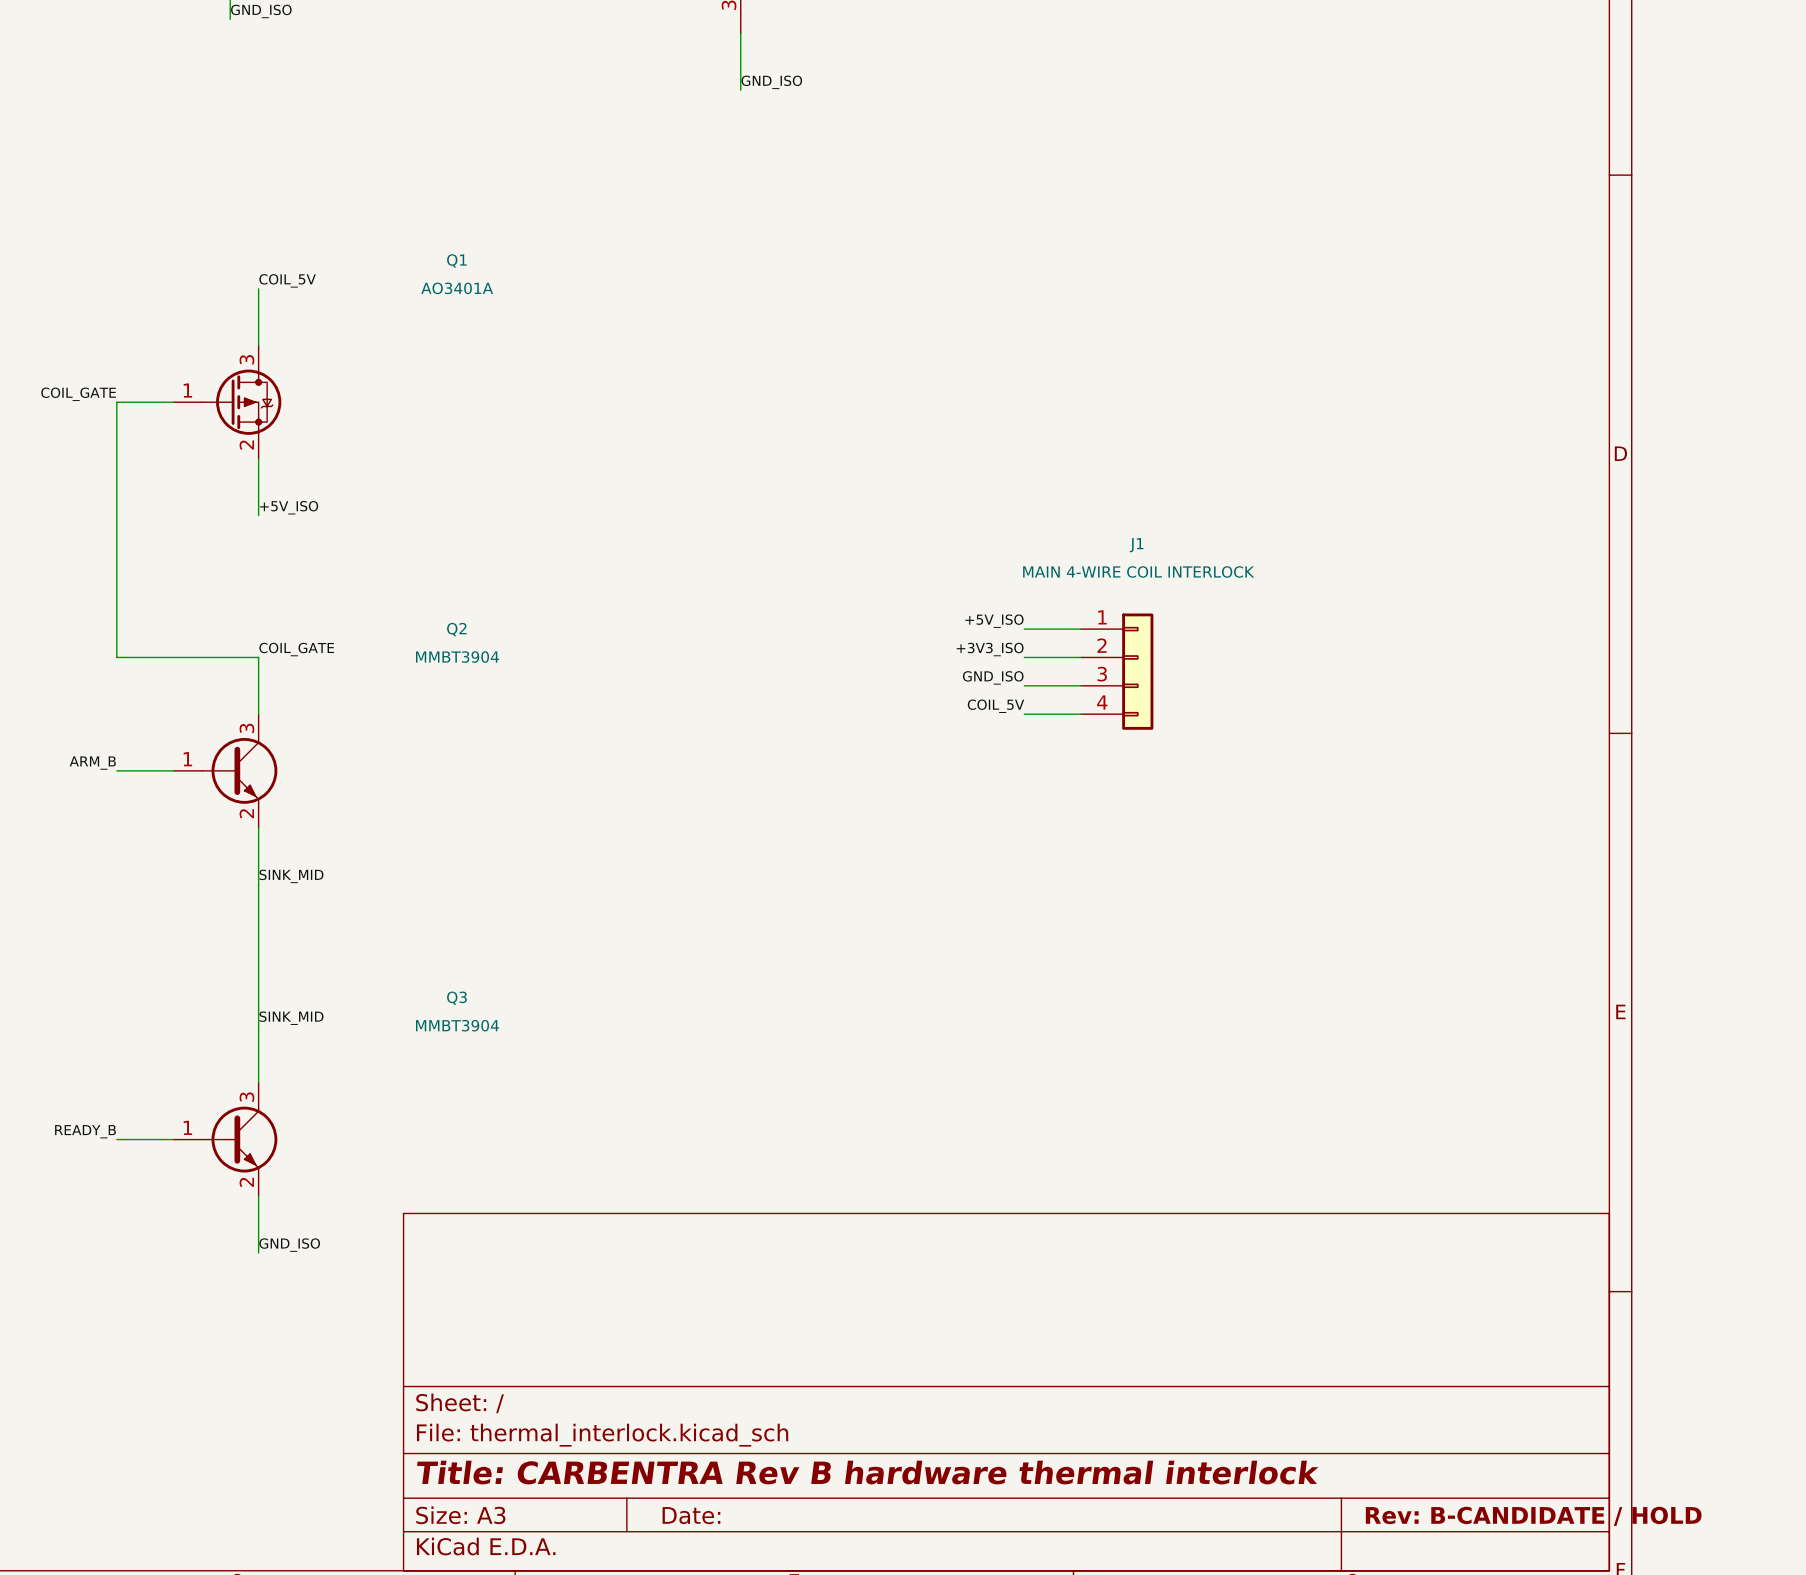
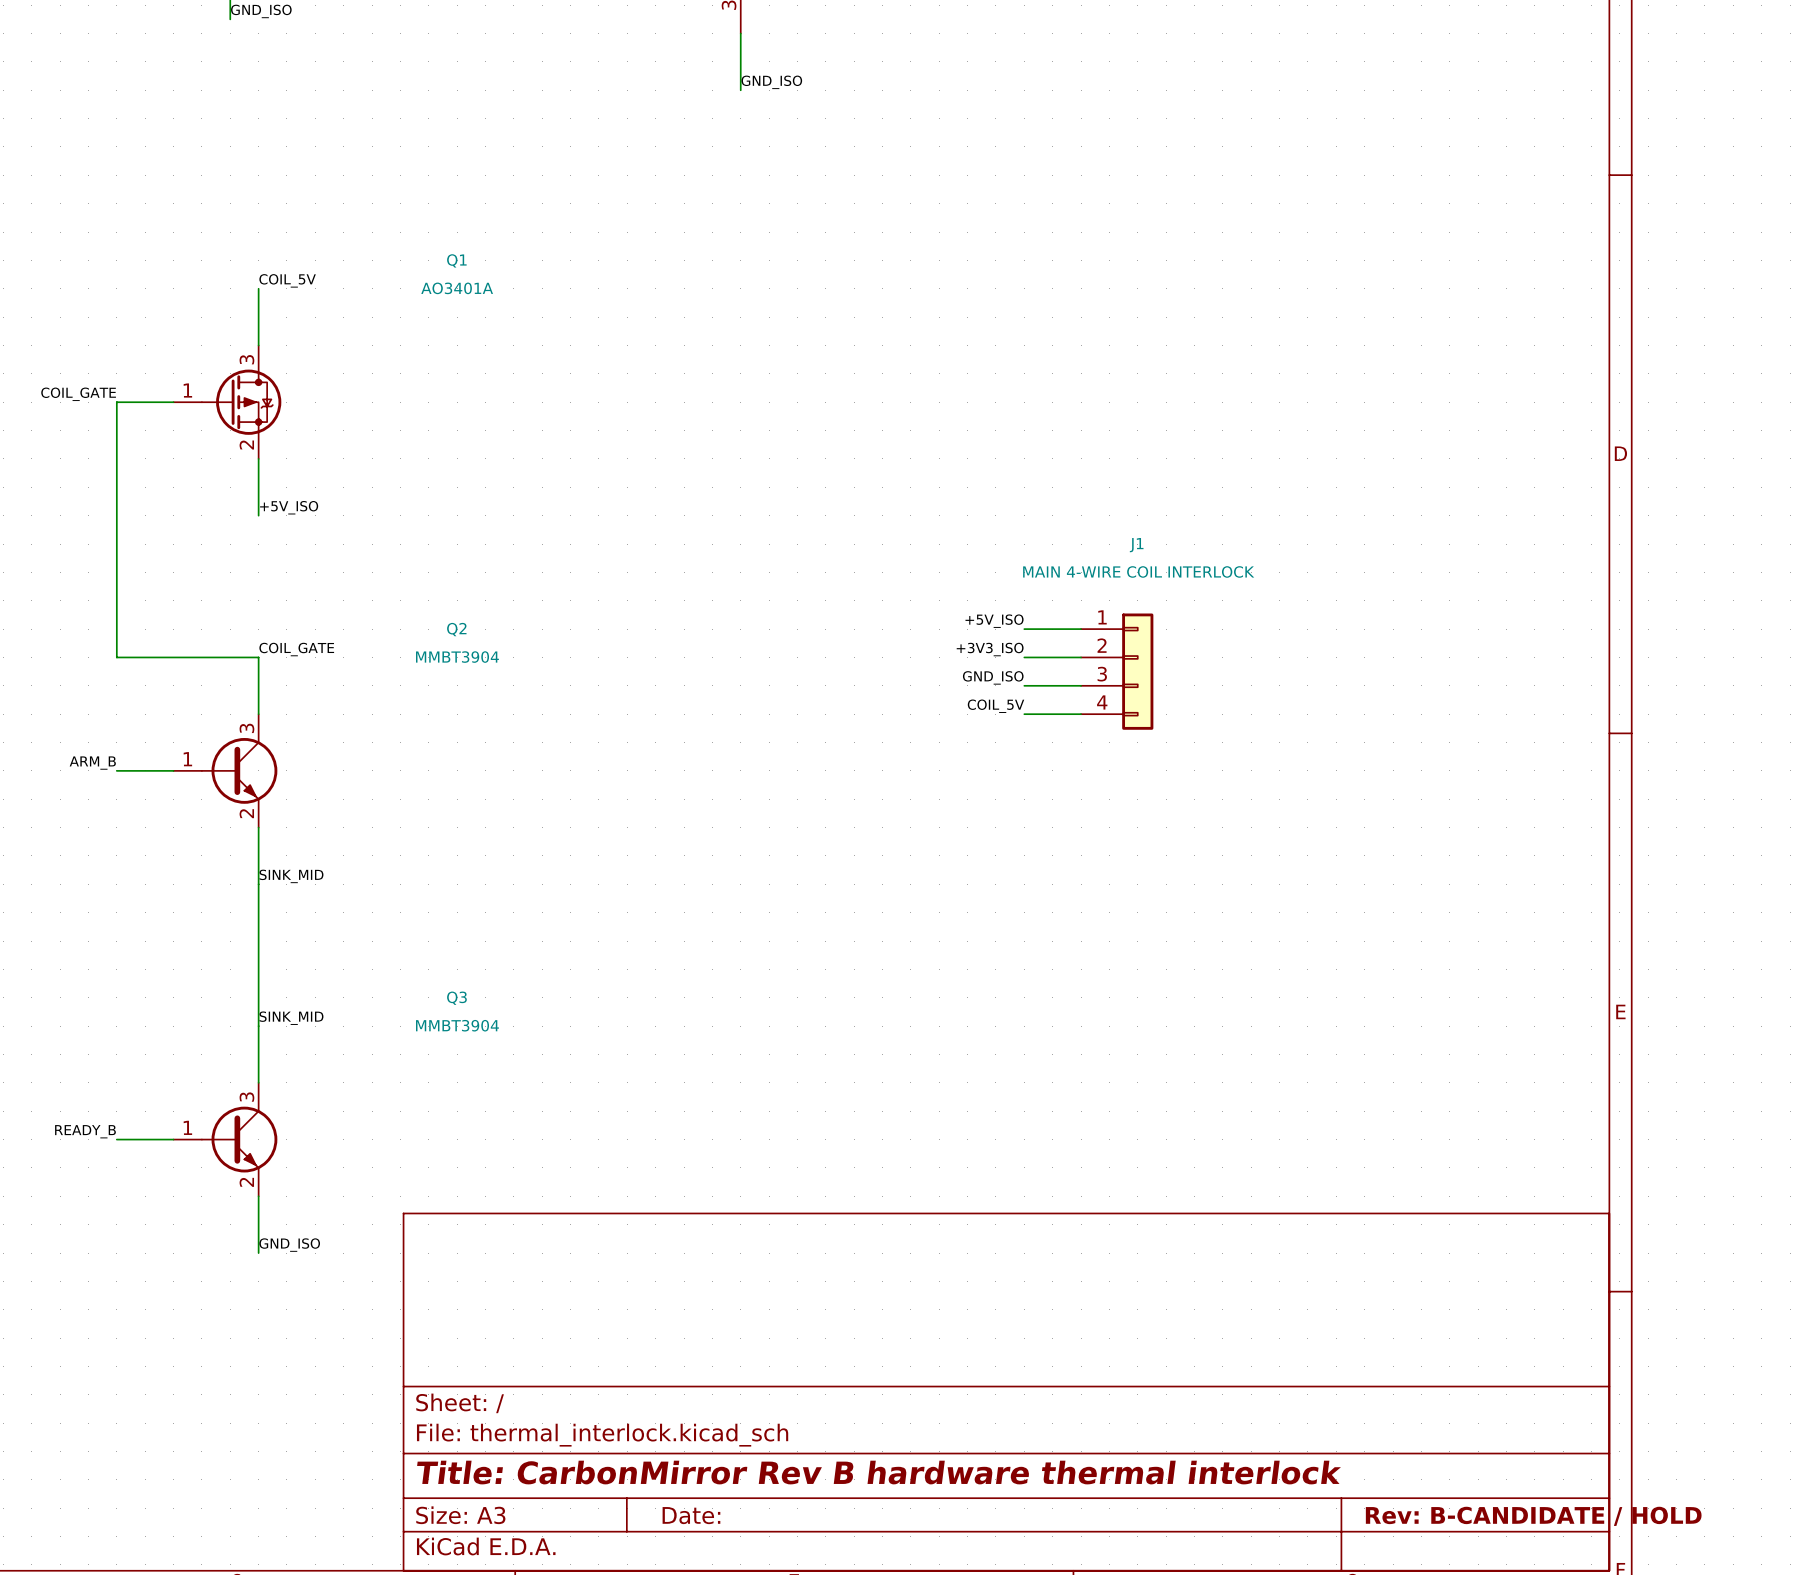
title block: Title: CARBENTRA Rev B hardware thermal interlock (867, 1472) -> Title: CarbonMirror Rev B hardware thermal interlock (879, 1472)

